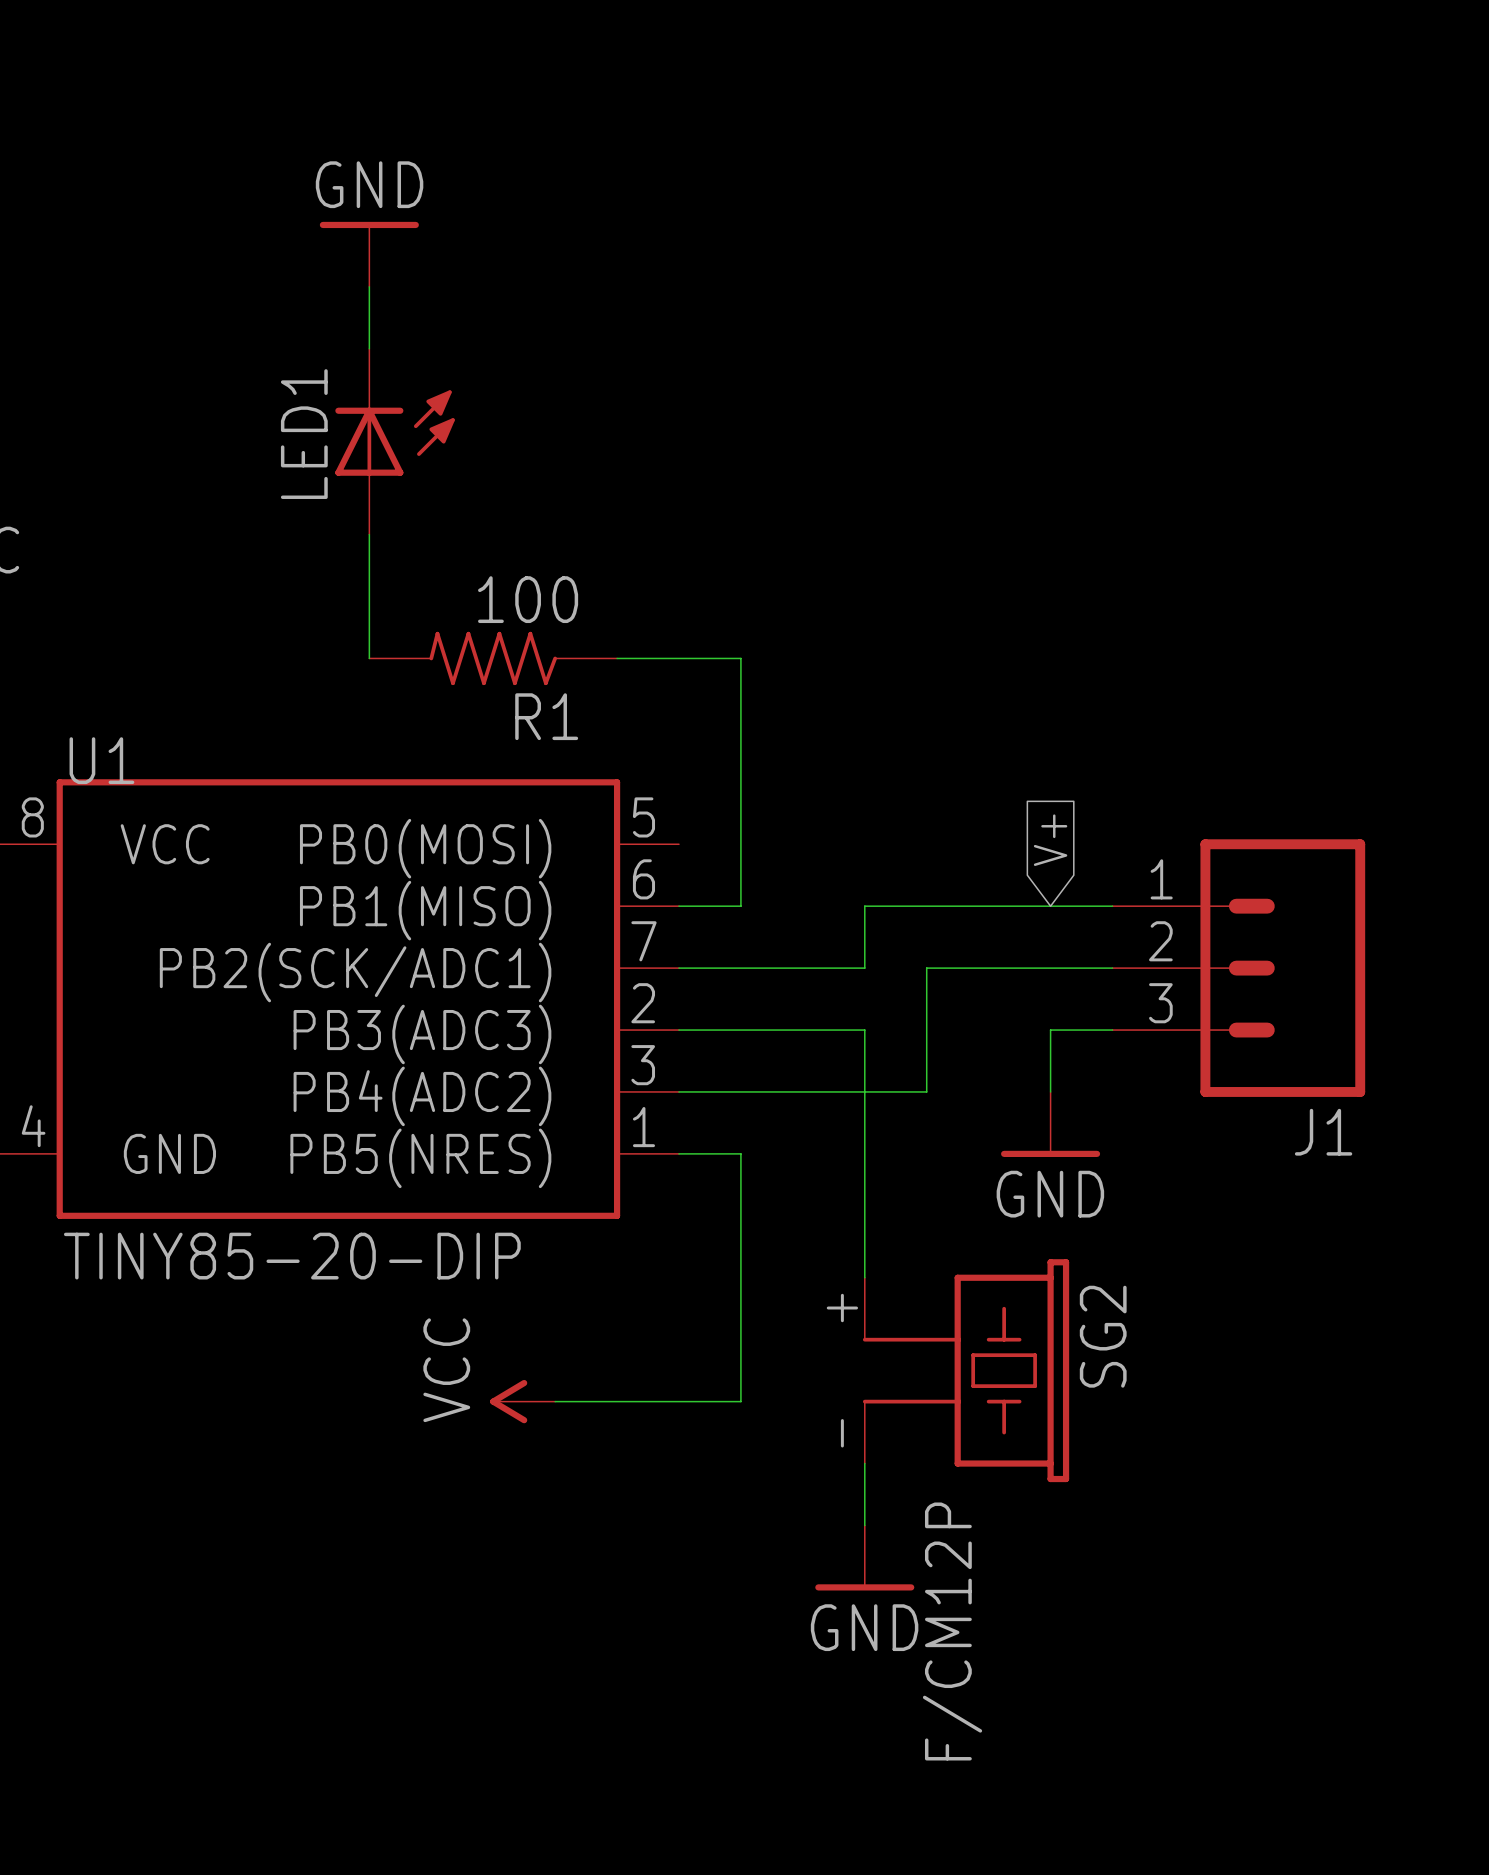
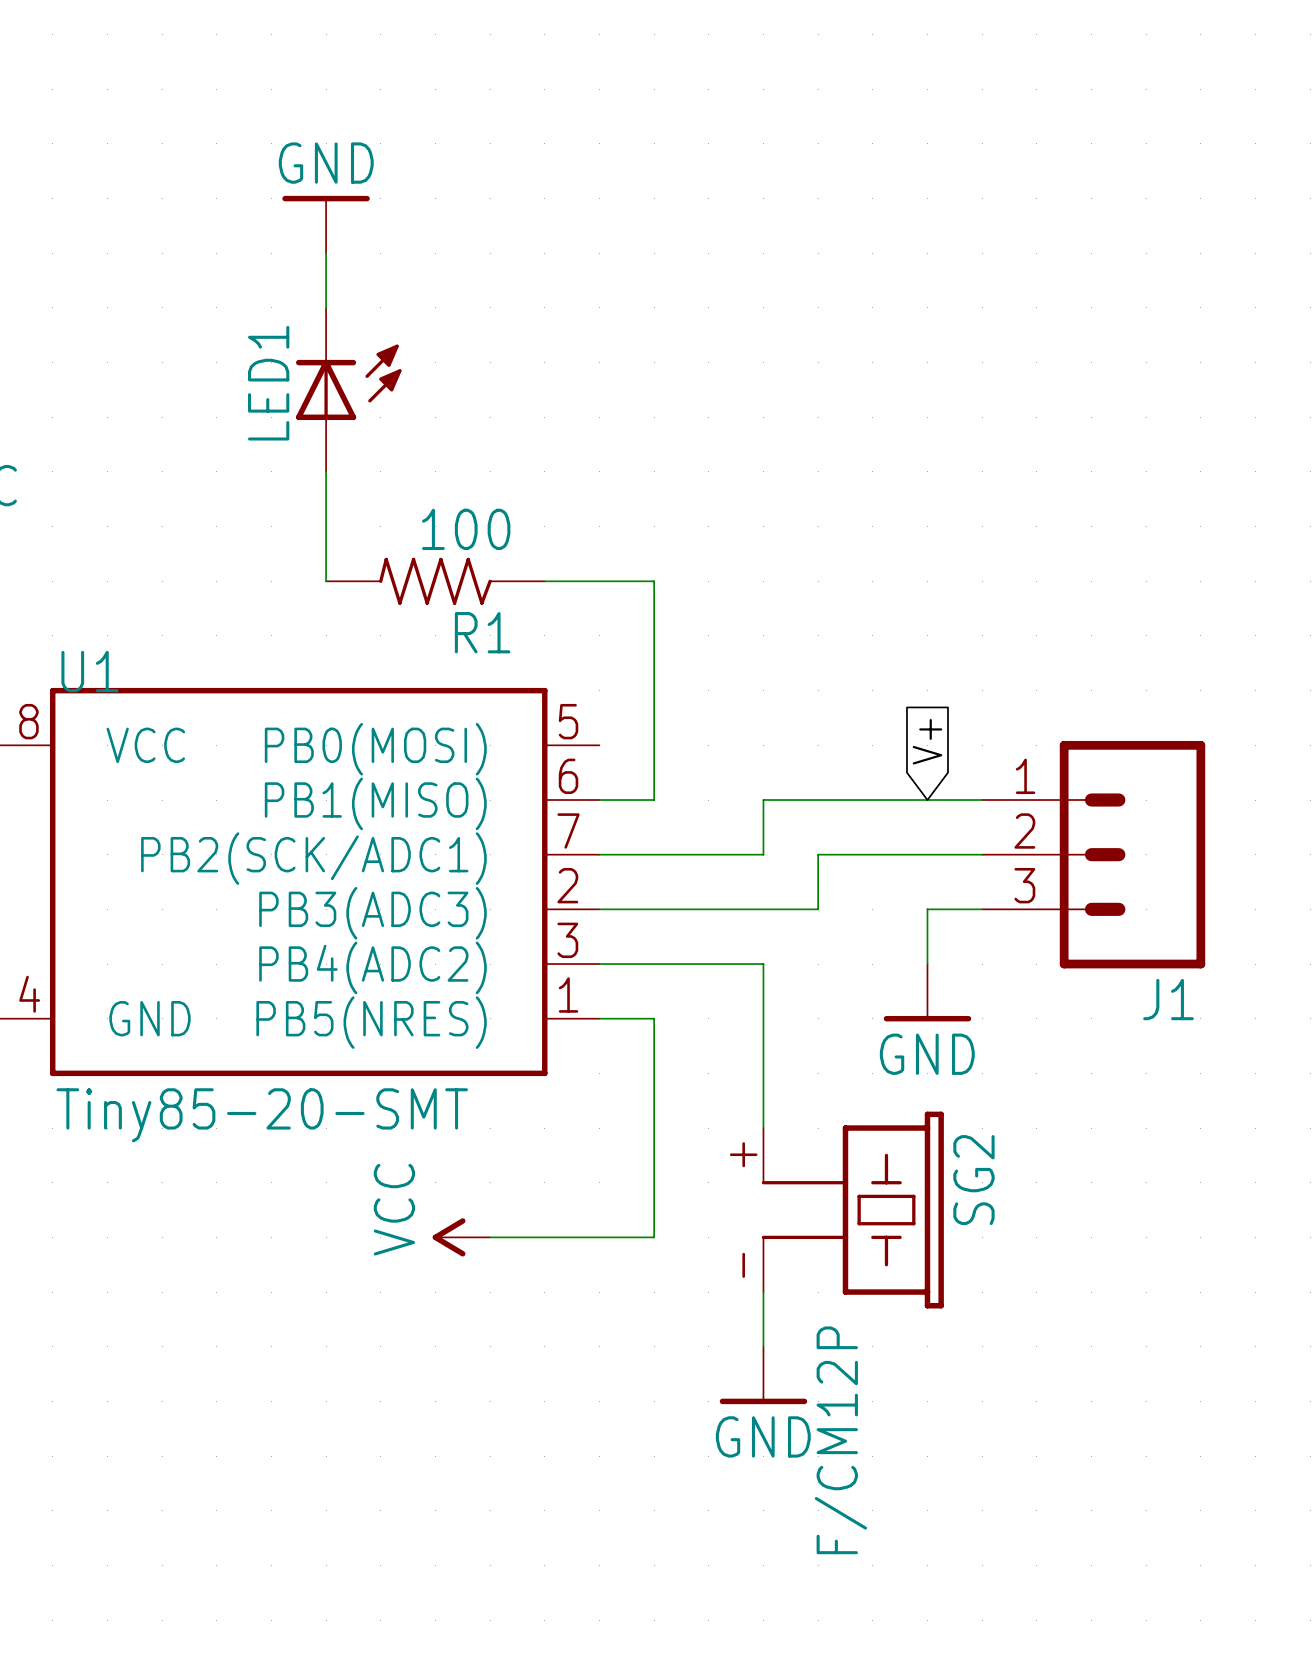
wire: (864, 1030) (864, 1091) (926, 1091) (926, 1030) -> (763, 909) (818, 909)
U1 value: TINY85-20-DIP (292, 1256) -> Tiny85-20-SMT (262, 1115)

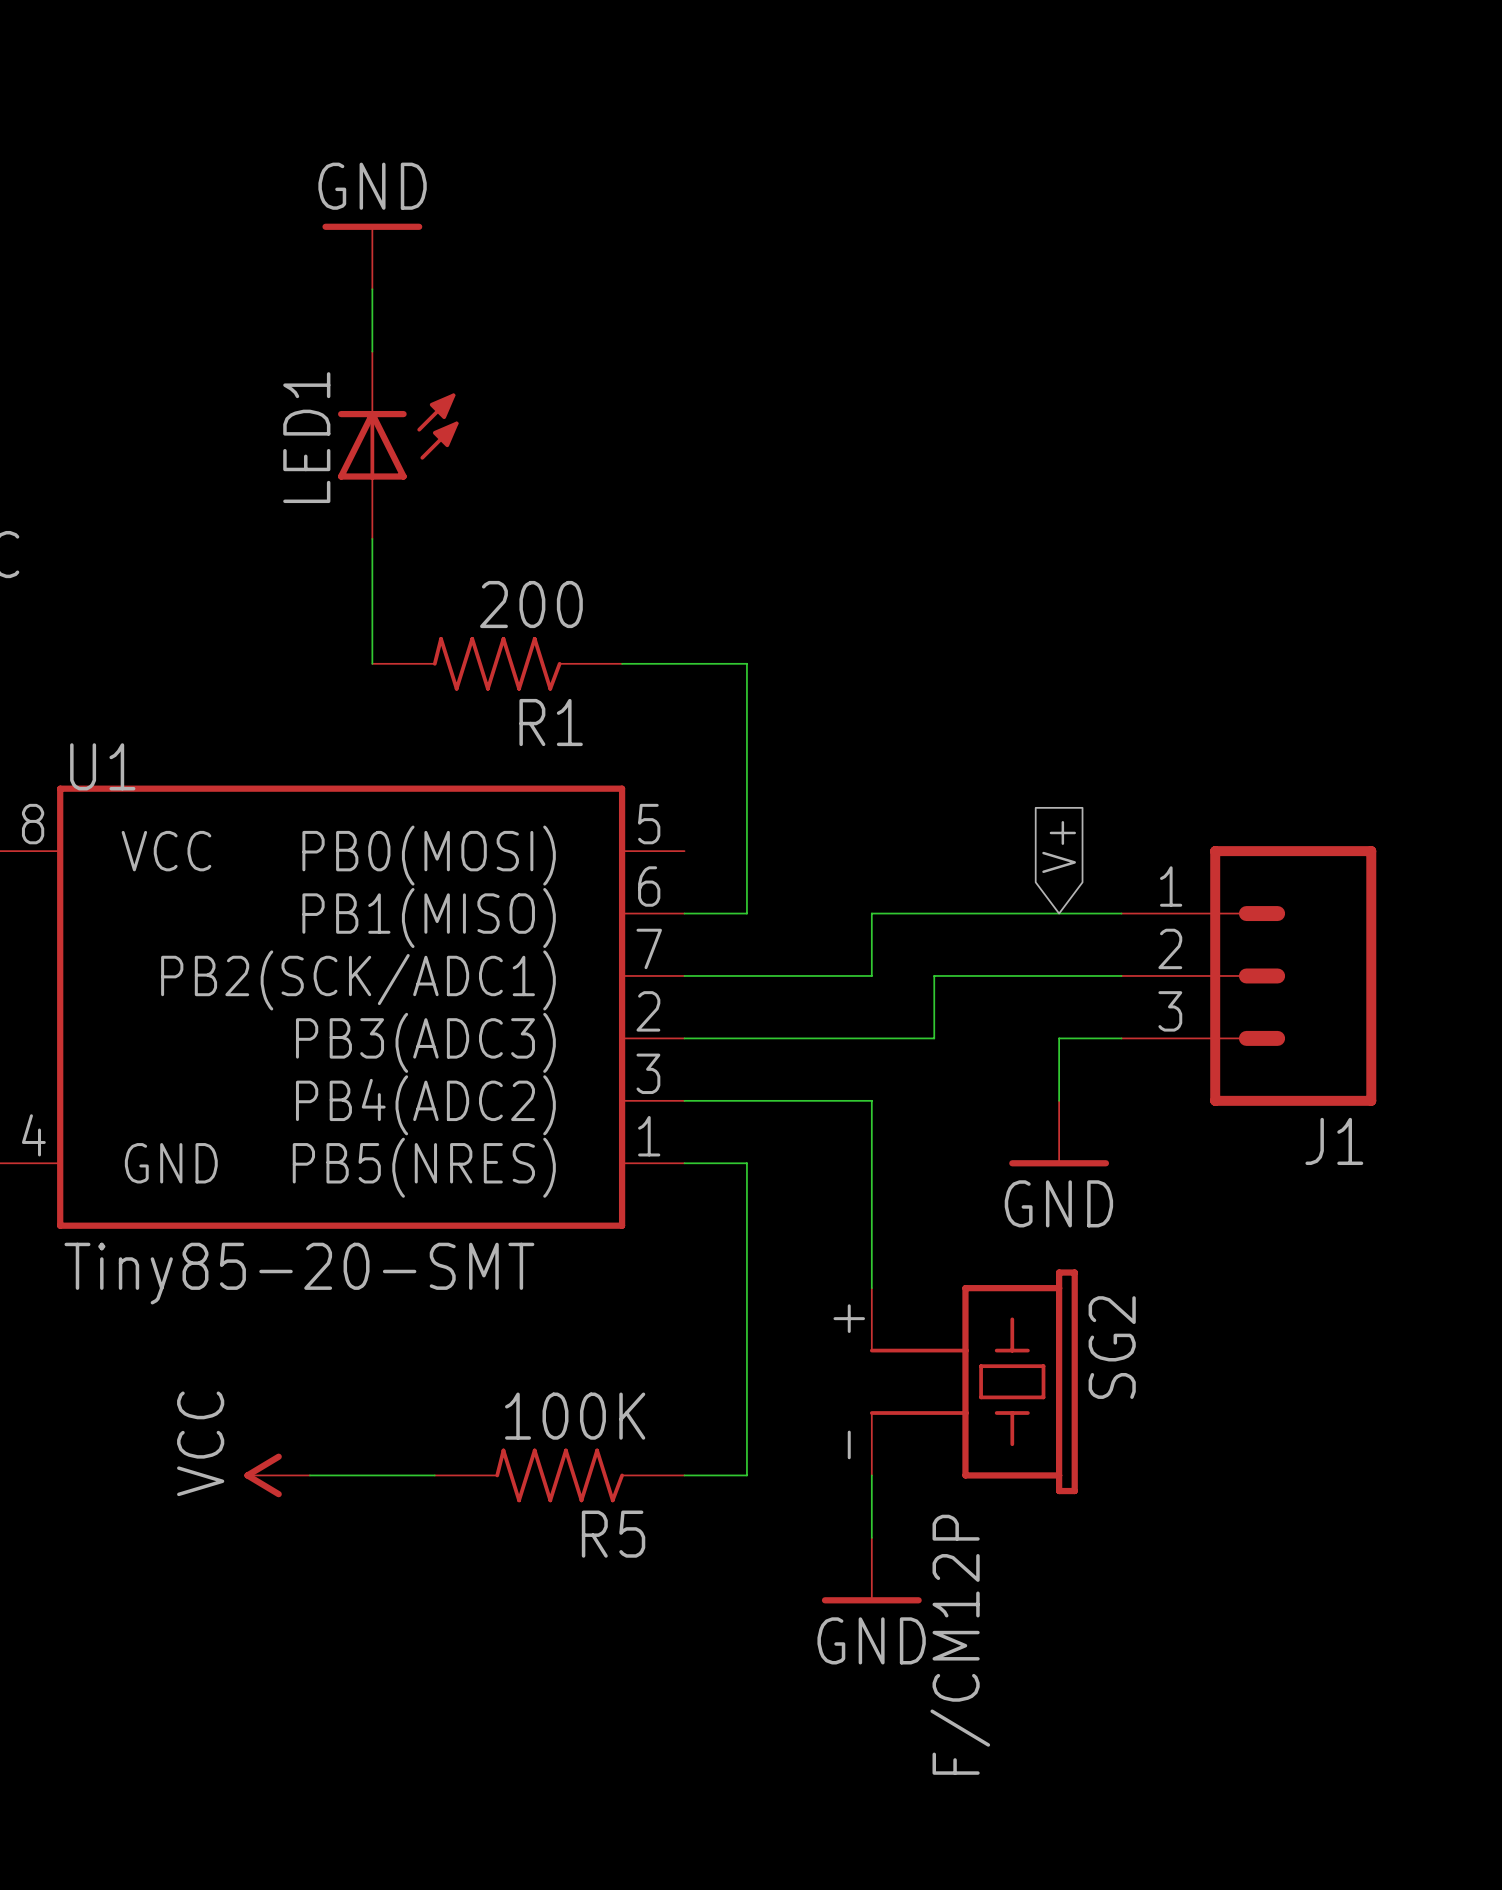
R1 value: 100 (466, 529) -> 200 (531, 604)
power symbol position: VCC (461, 1237) -> VCC (277, 1475)
wire: (490, 1237) (654, 1237) -> (684, 1475) (746, 1475) (746, 1413)
wire: none -> (309, 1475) (434, 1475)
R5: none -> 100K (559, 1475)

